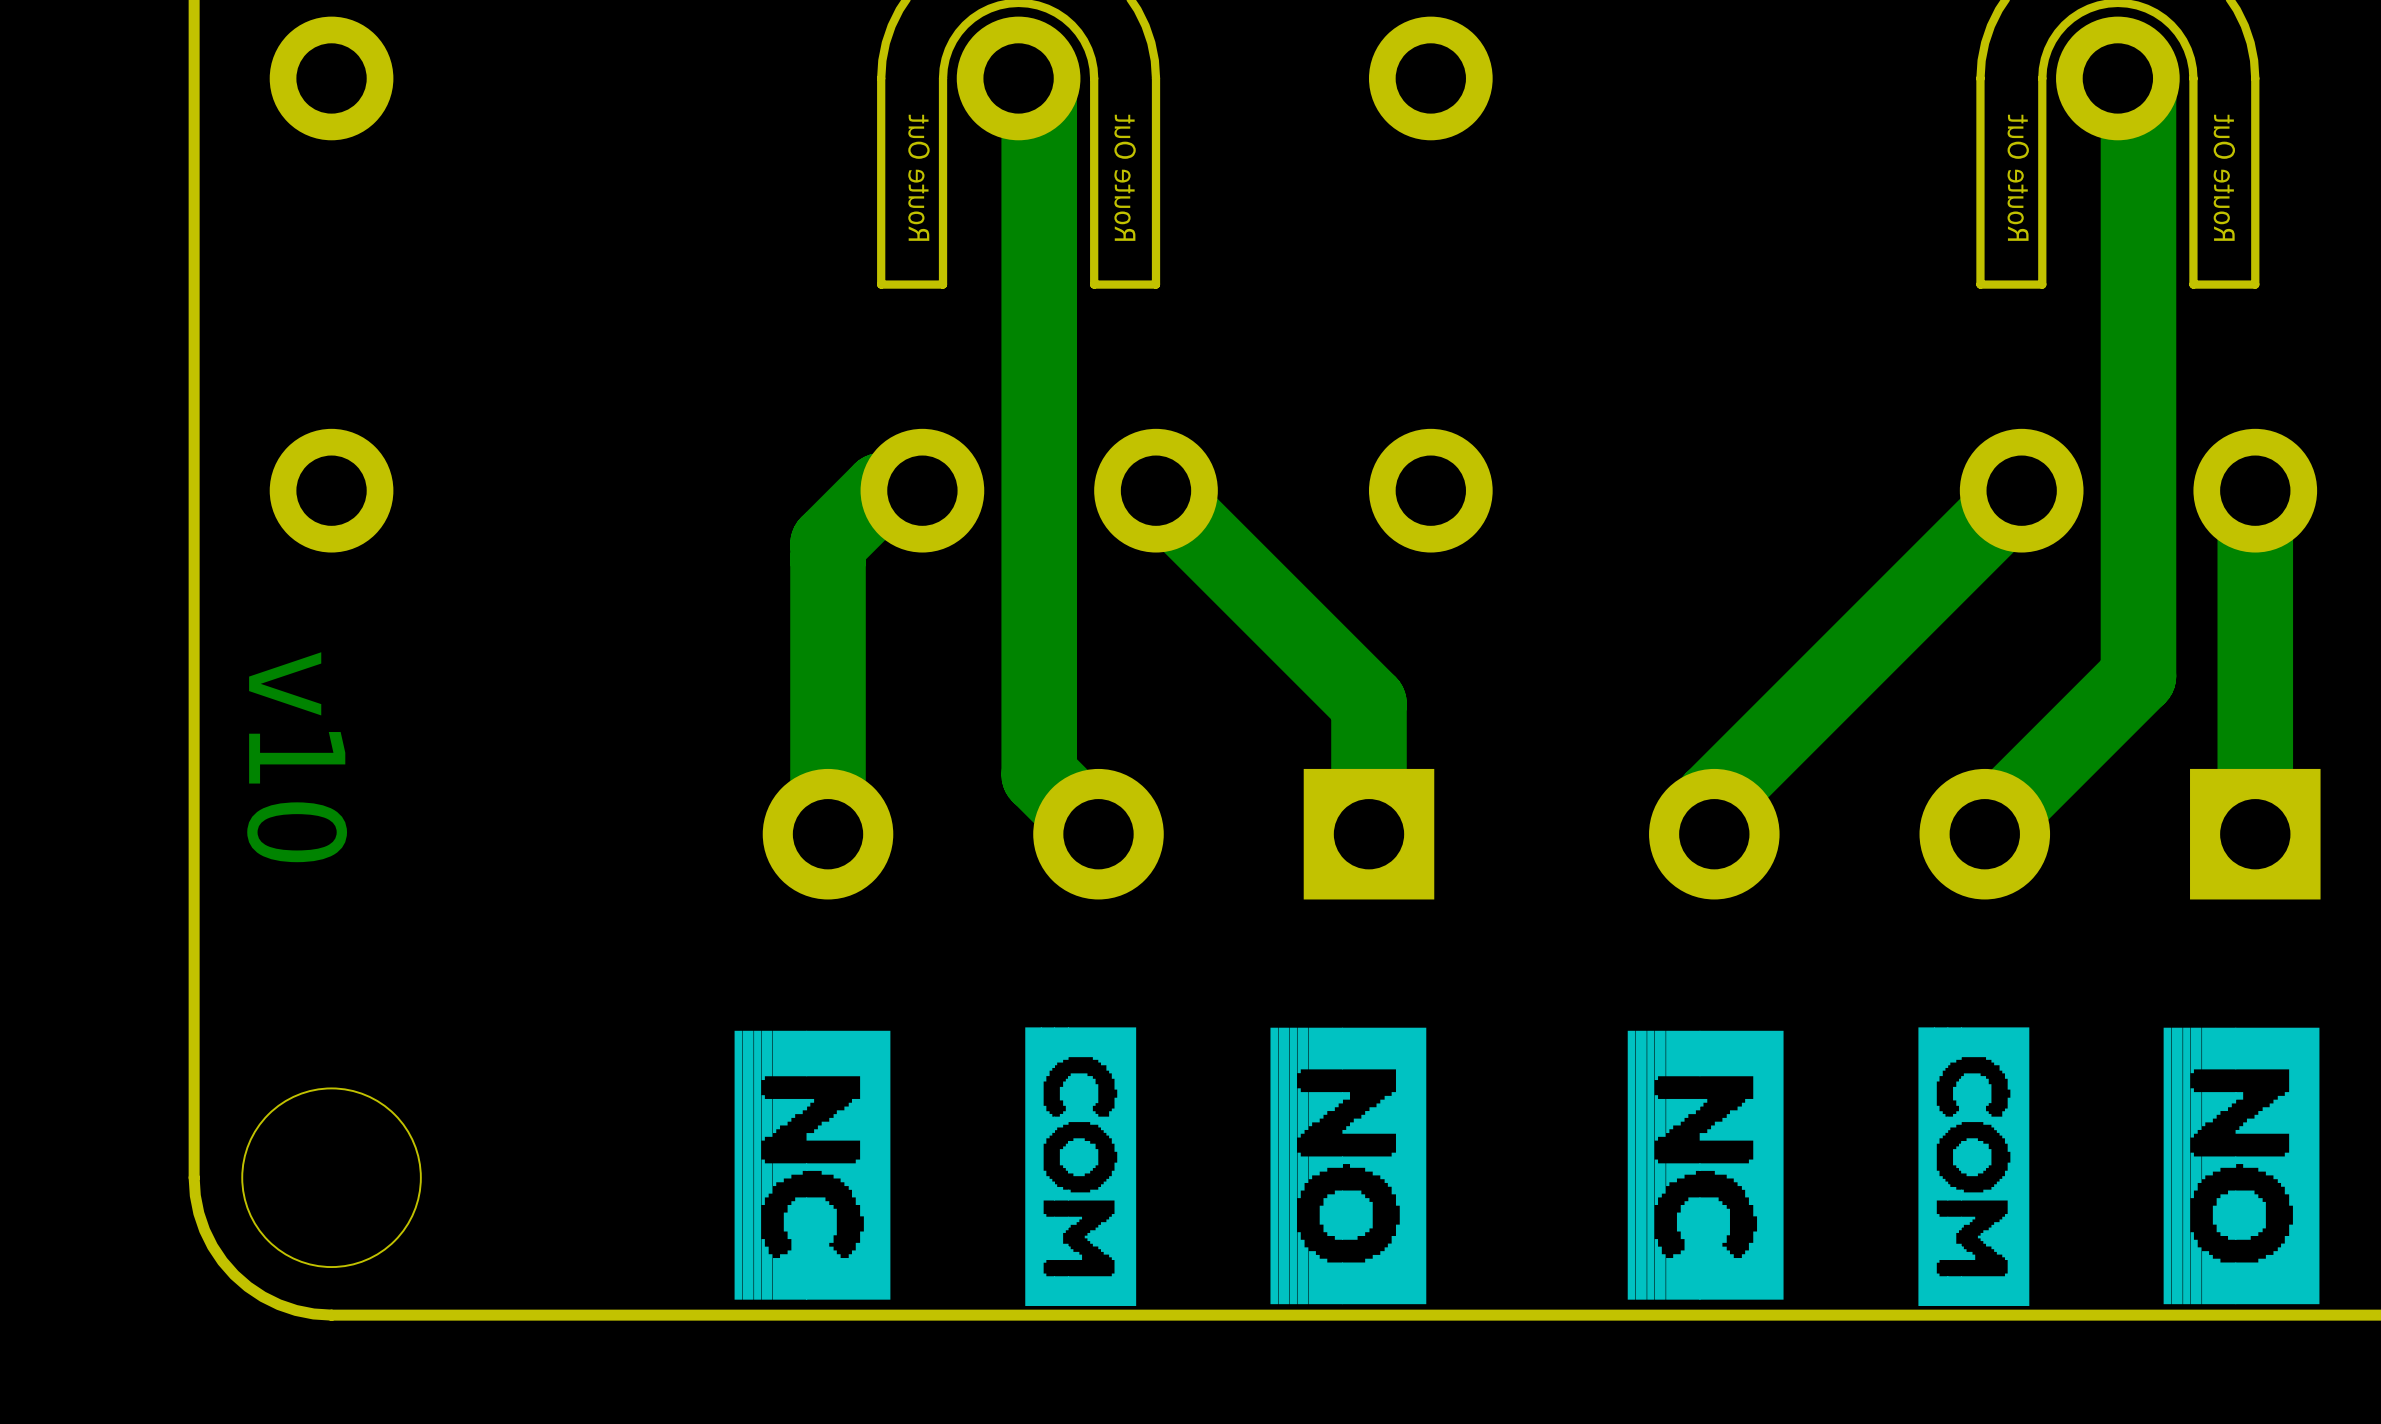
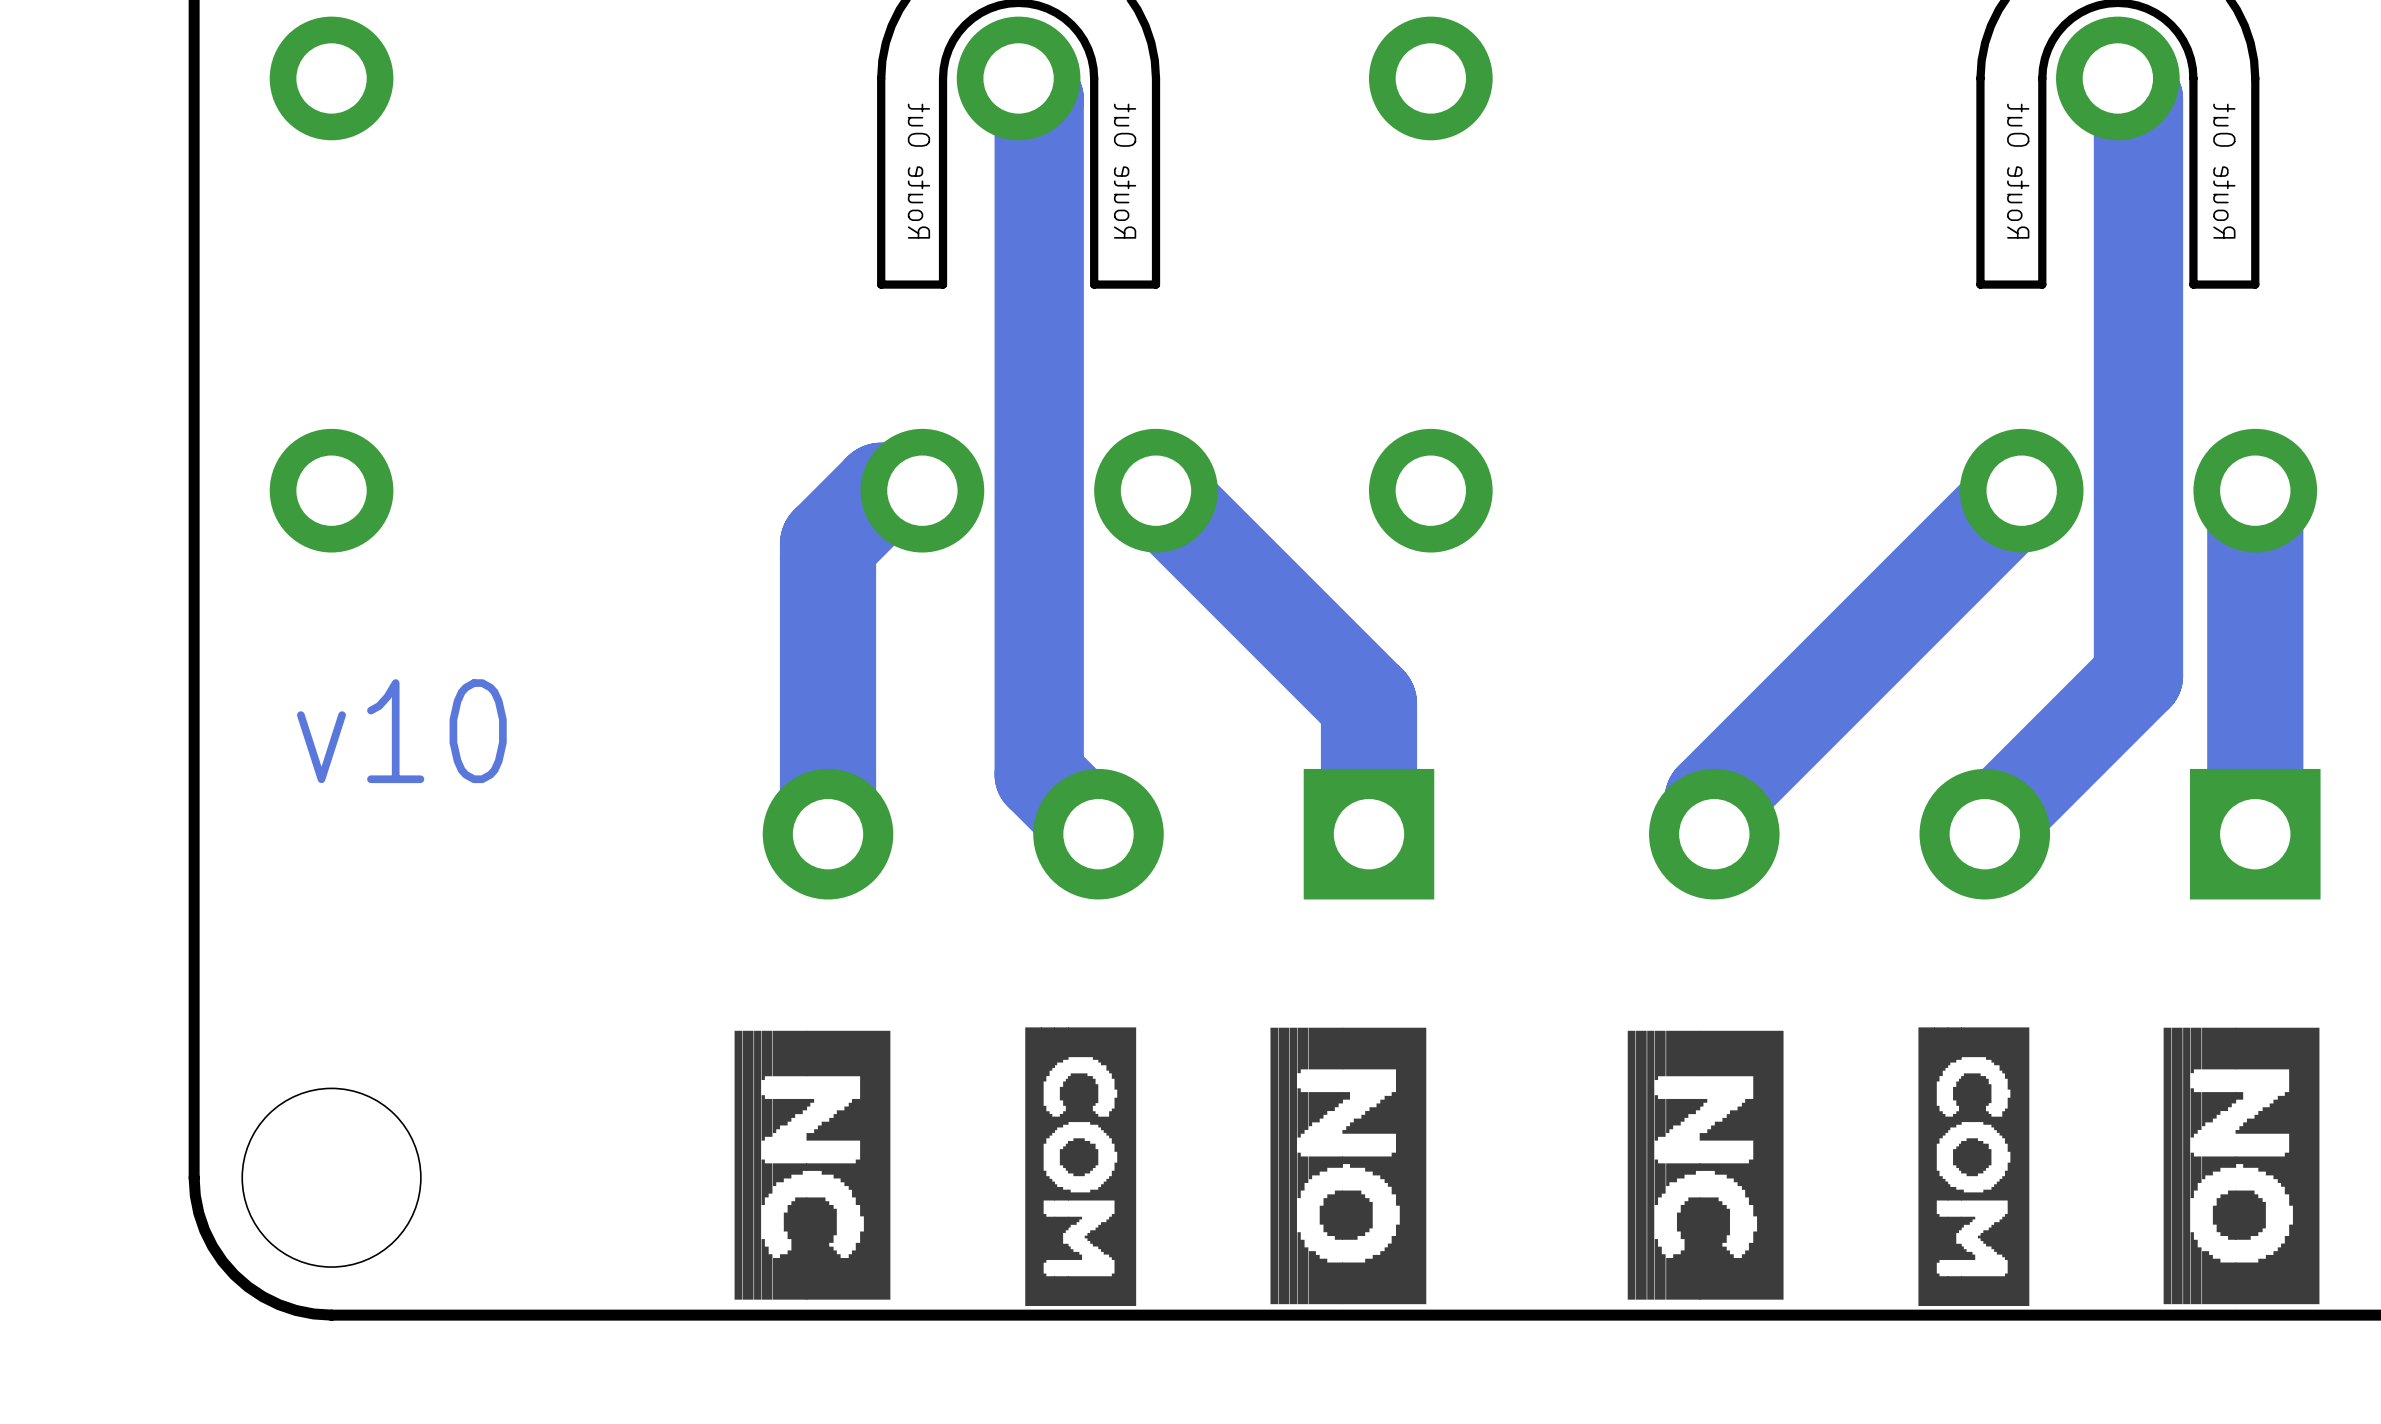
track width: thin (1018, 78) (1039, 99) (1039, 774) (1098, 834) -> thick (1018, 78) (1039, 99) (1039, 774) (1098, 834)
track width: thin (2117, 78) (2138, 99) (2138, 676) (1984, 829) (1984, 834) -> thick (2117, 78) (2138, 99) (2138, 676) (1984, 829) (1984, 834)
track width: thin (922, 490) (881, 490) (828, 543) (828, 834) -> thick (922, 490) (881, 490) (828, 543) (828, 834)
track width: thin (1156, 490) (1368, 703) (1368, 834) -> thick (1156, 490) (1368, 703) (1368, 834)
track width: thin (2021, 490) (1712, 799) (1712, 834) -> thick (2021, 490) (1712, 799) (1712, 834)
track width: thin (2255, 490) (2255, 834) -> thick (2255, 490) (2255, 834)
text rotation: 0° (297, 757) -> 90° counterclockwise (401, 731)

